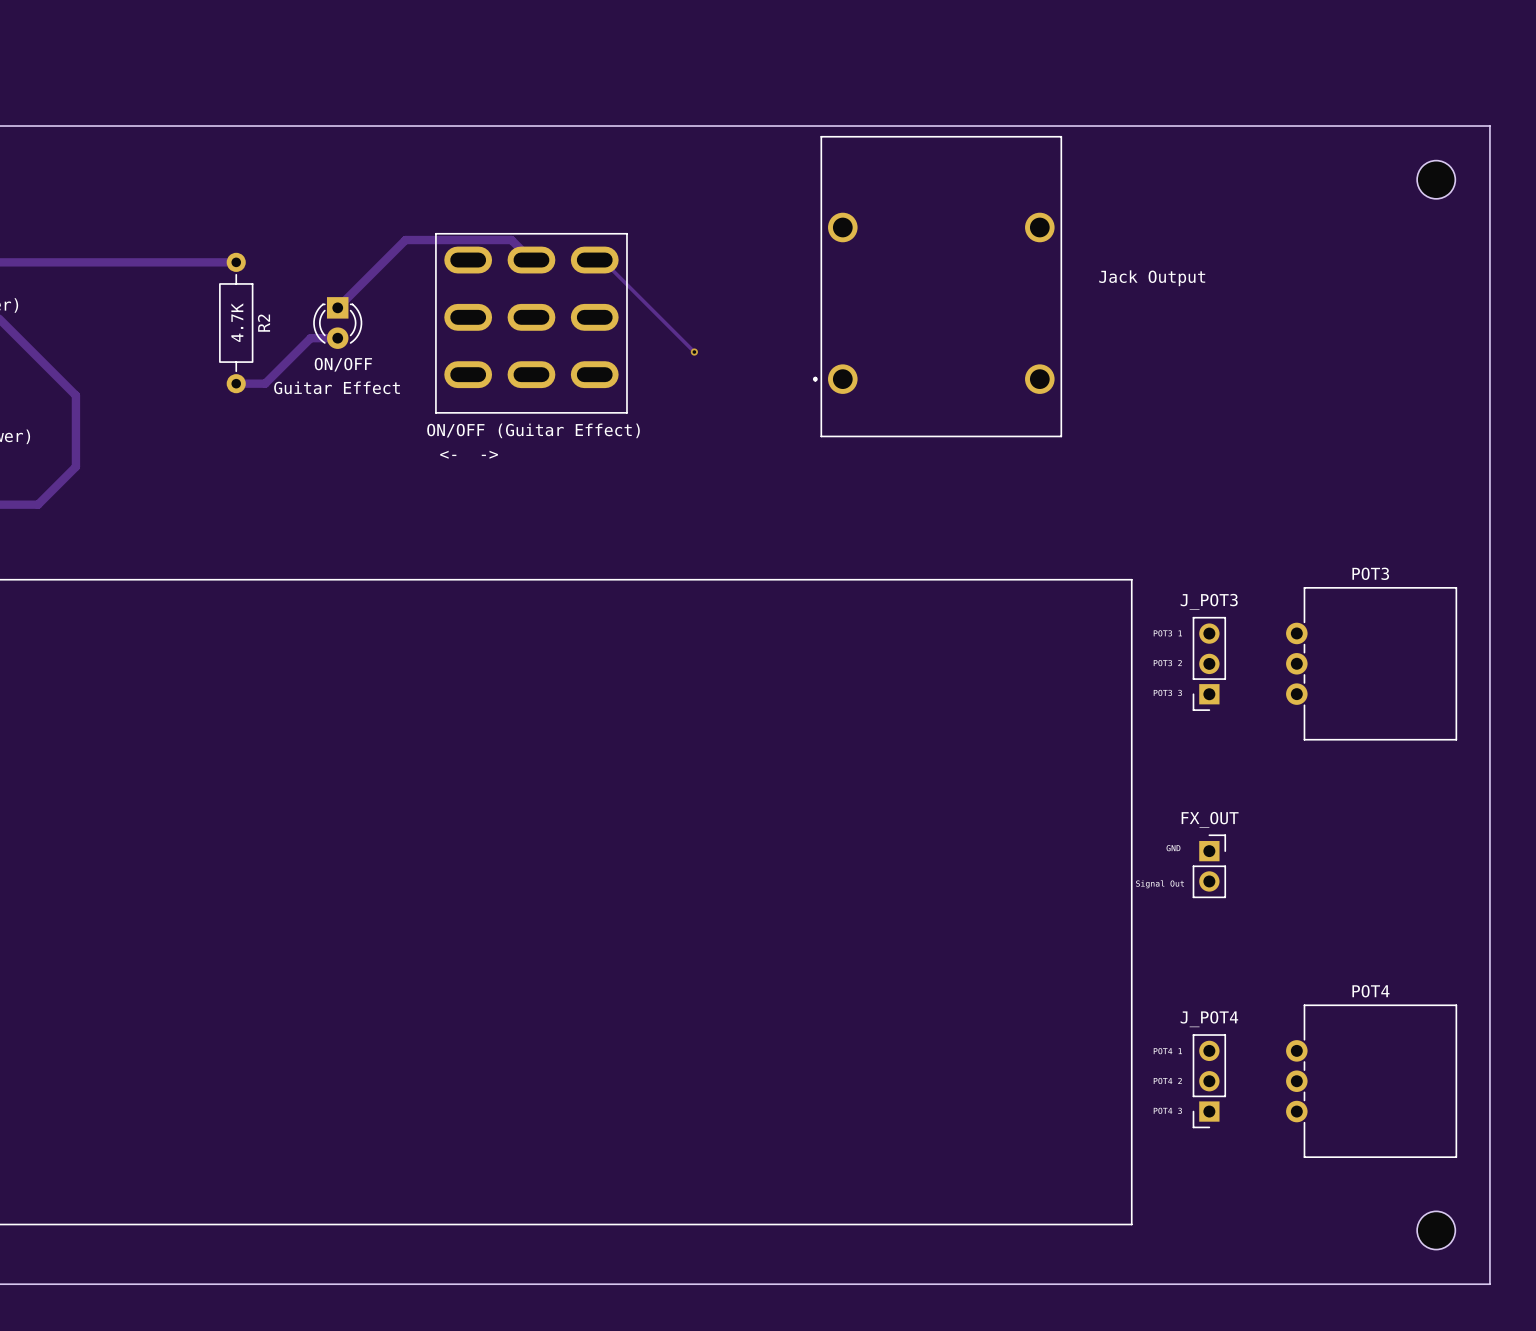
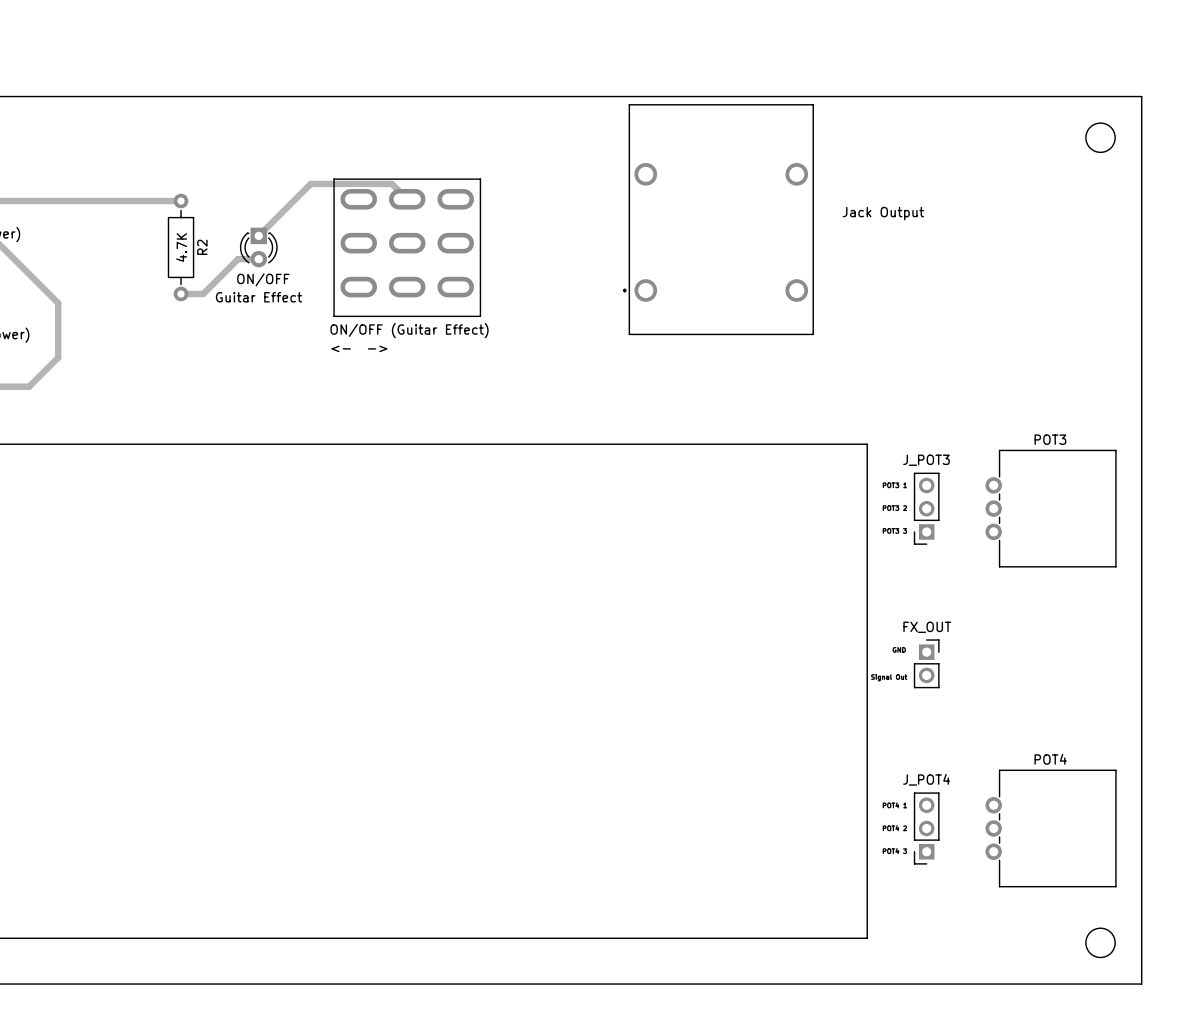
track: (594, 260) (602, 260) (694, 352) -> none
via: (694, 352) -> none

